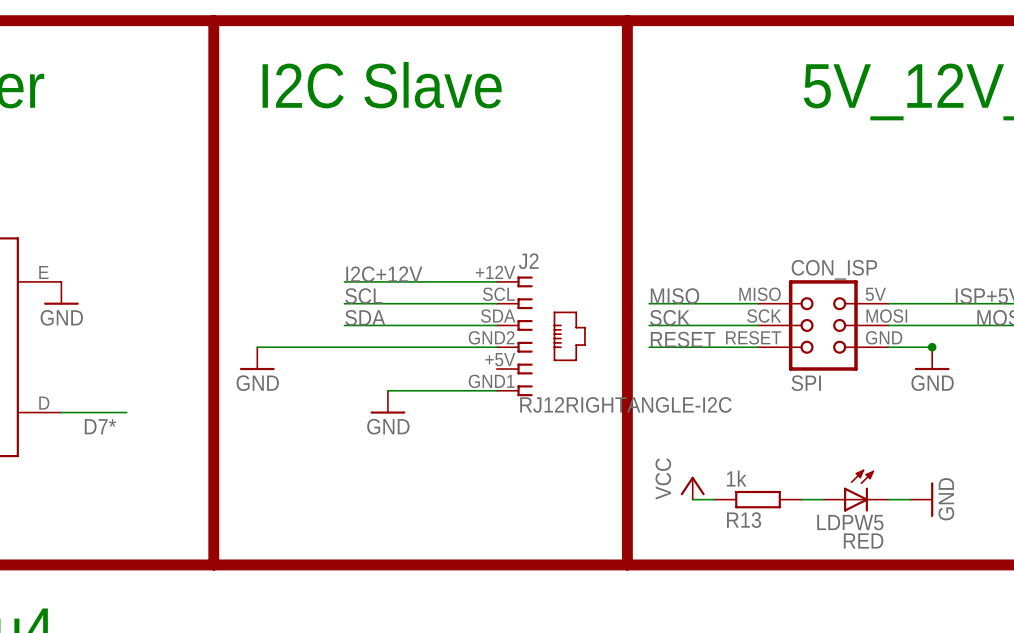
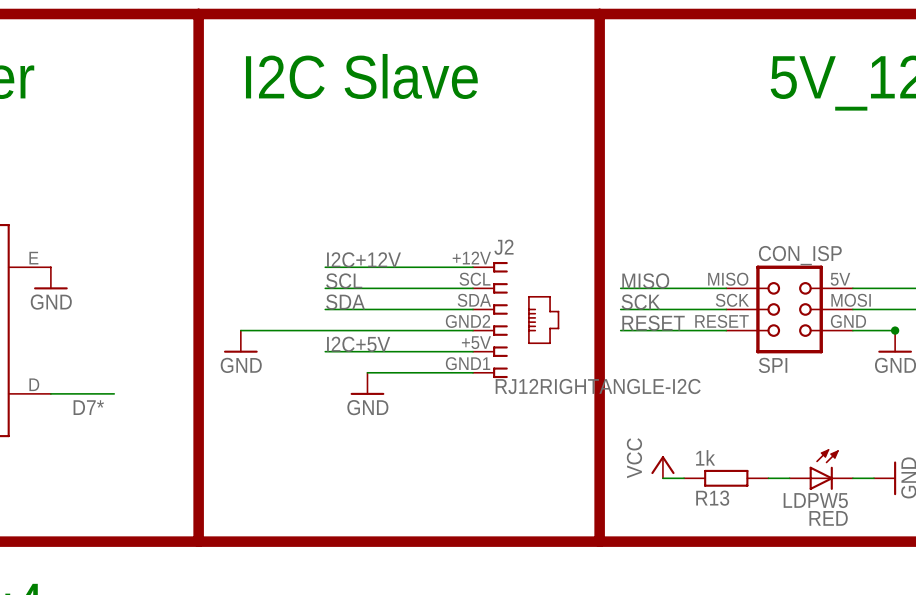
label: none -> I2C+5V (358, 344)
wire: none -> (325, 351) (473, 351)

